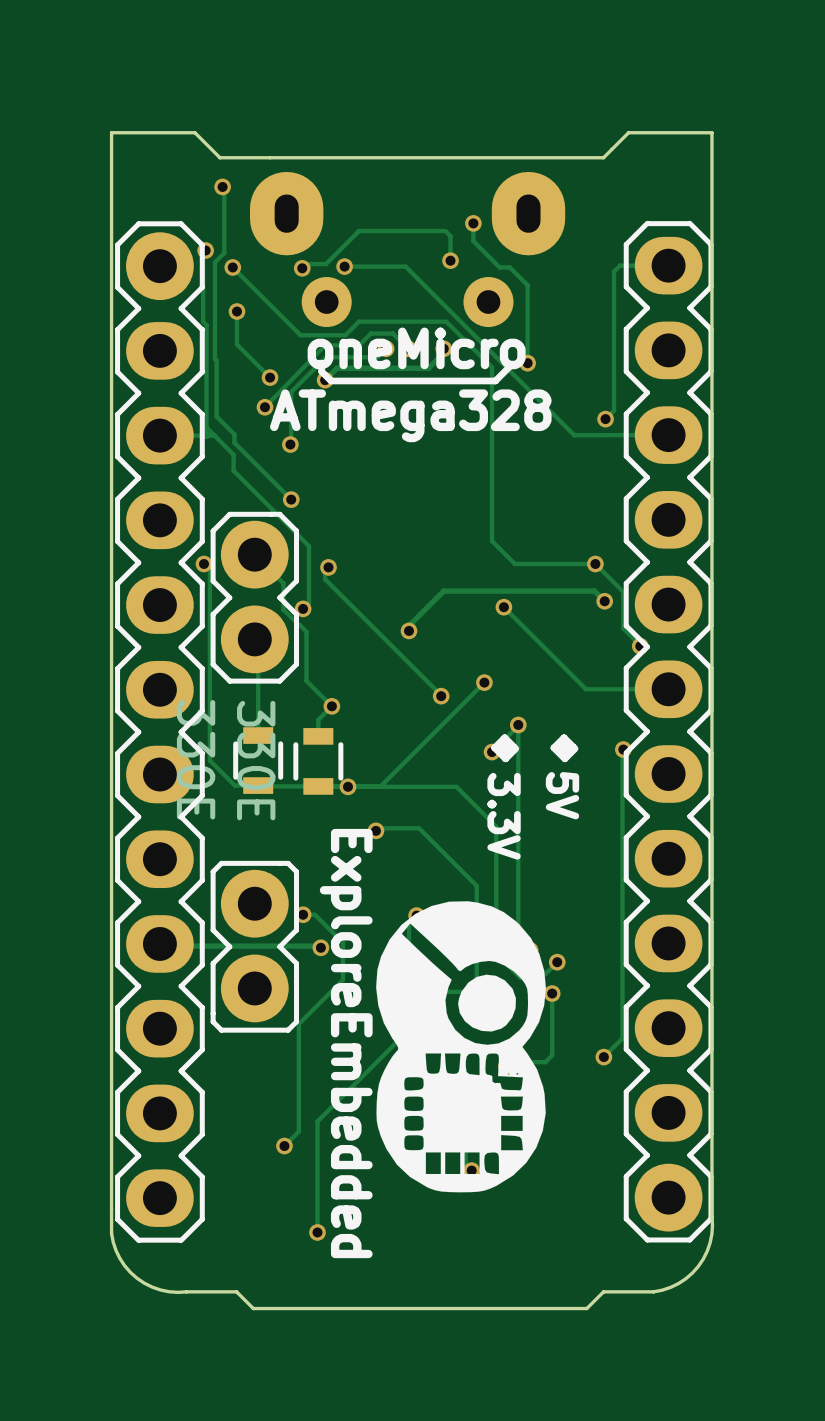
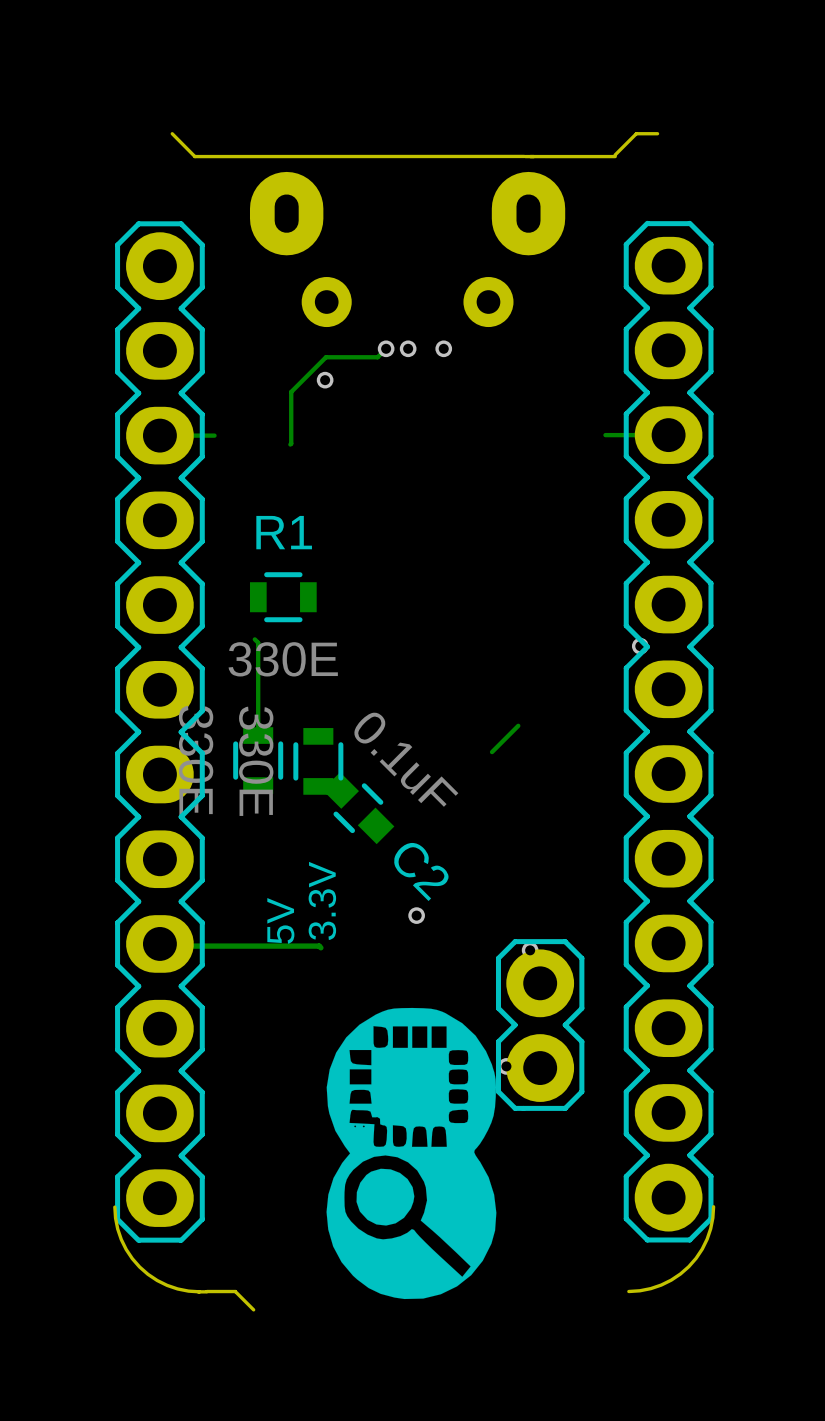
board edge: none -> (172, 133) (194, 156) (524, 156)
board edge: none -> (657, 133) (636, 133) (615, 154)
board edge: none -> (615, 156) (525, 156)
track: (222, 186) (224, 188) (224, 253) (214, 262) (216, 416) (234, 434) (234, 442) (291, 499) -> none
via: (222, 186) -> none
track: (473, 223) (473, 241) (499, 267) (509, 267) (527, 285) (527, 363) -> none
via: (473, 223) -> none
track: (205, 250) (203, 253) (203, 321) (206, 325) (206, 436) (207, 435) -> none
via: (205, 250) -> none
track: (450, 260) (450, 236) (445, 231) (359, 231) (325, 264) (306, 264) (302, 268) -> none
via: (450, 260) -> none
track: (668, 265) (620, 265) (614, 271) (614, 410) (605, 419) -> none
track: (344, 266) (405, 266) (574, 435) (605, 435) -> none
via: (344, 266) -> none
track: (232, 267) (300, 335) (345, 335) (359, 321) (446, 321) (492, 367) (492, 541) (514, 563) (595, 563) (623, 591) (623, 628) (640, 646) -> none
via: (232, 267) -> none
via: (302, 268) -> none
track: (237, 311) (237, 344) (270, 377) -> none
via: (237, 311) -> none
track: (408, 348) (392, 333) (370, 333) (359, 345) (325, 345) (264, 407) -> none
text: oneMicro (416, 348) -> none
track: (443, 348) (443, 353) (428, 368) (336, 368) (325, 380) -> none
line: (318, 363) (321, 363) (321, 371) (331, 380) (495, 380) (512, 364) -> none
via: (527, 363) -> none
via: (270, 377) -> none
via: (264, 407) -> none
text: ATmega328 (410, 415) -> none
via: (605, 419) -> none
track: (206, 427) (233, 454) (233, 470) (309, 546) (309, 602) (303, 608) -> none
via: (290, 444) -> none
via: (291, 499) -> none
track: (254, 554) (283, 583) (283, 609) (306, 631) (306, 680) (331, 706) (318, 719) (318, 736) -> none
track: (203, 563) (209, 569) (209, 760) (234, 785) (380, 786) (484, 682) -> none
via: (203, 563) -> none
via: (595, 563) -> none
track: (328, 567) (325, 570) (325, 579) (441, 696) -> none
via: (328, 567) -> none
part rotation: 0° (254, 597) -> 180° (540, 1025)
part position: (254, 597) -> (540, 1025)
R1: none -> 330E (283, 597)
track: (604, 601) (594, 591) (443, 591) (409, 625) (409, 630) -> none
via: (604, 601) -> none
track: (503, 607) (585, 689) (668, 689) -> none
via: (503, 607) -> none
via: (303, 608) -> none
via: (409, 630) -> none
via: (484, 682) -> none
via: (441, 696) -> none
via: (331, 706) -> none
track: (518, 724) (518, 938) (530, 950) -> none
via: (518, 724) -> none
line: (515, 748) (505, 758) (494, 747) (504, 737) (514, 746) (499, 746) (504, 752) (504, 742) (508, 746) (506, 749) (506, 752) -> none
line: (575, 748) (564, 758) (553, 747) (564, 737) (573, 746) (558, 746) (564, 752) (564, 742) (568, 746) (565, 749) (565, 752) -> none
track: (623, 749) (622, 1038) (603, 1057) -> none
via: (623, 749) -> none
via: (492, 752) -> none
track: (348, 786) (456, 786) (496, 826) (496, 953) (519, 977) (542, 977) (557, 962) -> none
via: (348, 786) -> none
text rotation: 0° (562, 795) -> 180° (280, 920)
text position: 5V (562, 795) -> 5V (280, 920)
C2: none -> 0.1uF (358, 808)
text rotation: 0° (504, 816) -> 180° (322, 900)
text position: 3.3V (504, 816) -> 3.3V (322, 900)
track: (375, 830) (378, 828) (419, 828) (476, 885) (476, 996) (471, 991) (425, 991) (425, 1035) -> none
via: (375, 830) -> none
drawing: [376, 901, 546, 1193] -> none
track: (303, 914) (314, 914) (342, 942) (342, 979) (298, 1024) (298, 1131) (284, 1146) -> none
via: (303, 914) -> none
track: (416, 915) (409, 923) (409, 1029) (317, 1121) (317, 1232) -> none
part: (254, 946) -> none
via: (320, 947) -> none
via: (557, 962) -> none
track: (552, 993) (552, 1055) (545, 1062) (510, 1062) (506, 1066) -> none
via: (552, 993) -> none
drawing: none -> [326, 1007, 497, 1300]
text: ExploreEmbedded (346, 1043) -> none
via: (603, 1057) -> none
via: (284, 1146) -> none
via: (471, 1170) -> none
board edge: none -> (713, 1206) (707, 1239) (688, 1266) (661, 1285) (628, 1291)
board edge: none -> (114, 1207) (121, 1239) (139, 1267) (167, 1285) (199, 1291)
via: (317, 1232) -> none
board edge: (206, 1291) (236, 1291) (253, 1308) (586, 1308) (603, 1291) (653, 1291) (670, 1287) (692, 1272) (707, 1251) (712, 1225) (711, 132) (628, 132) (603, 157) (219, 157) (194, 132) (111, 132) (111, 1233) (115, 1250) (124, 1265) (144, 1283) (169, 1291) (198, 1291) -> (206, 1291) (235, 1291) (253, 1309)

